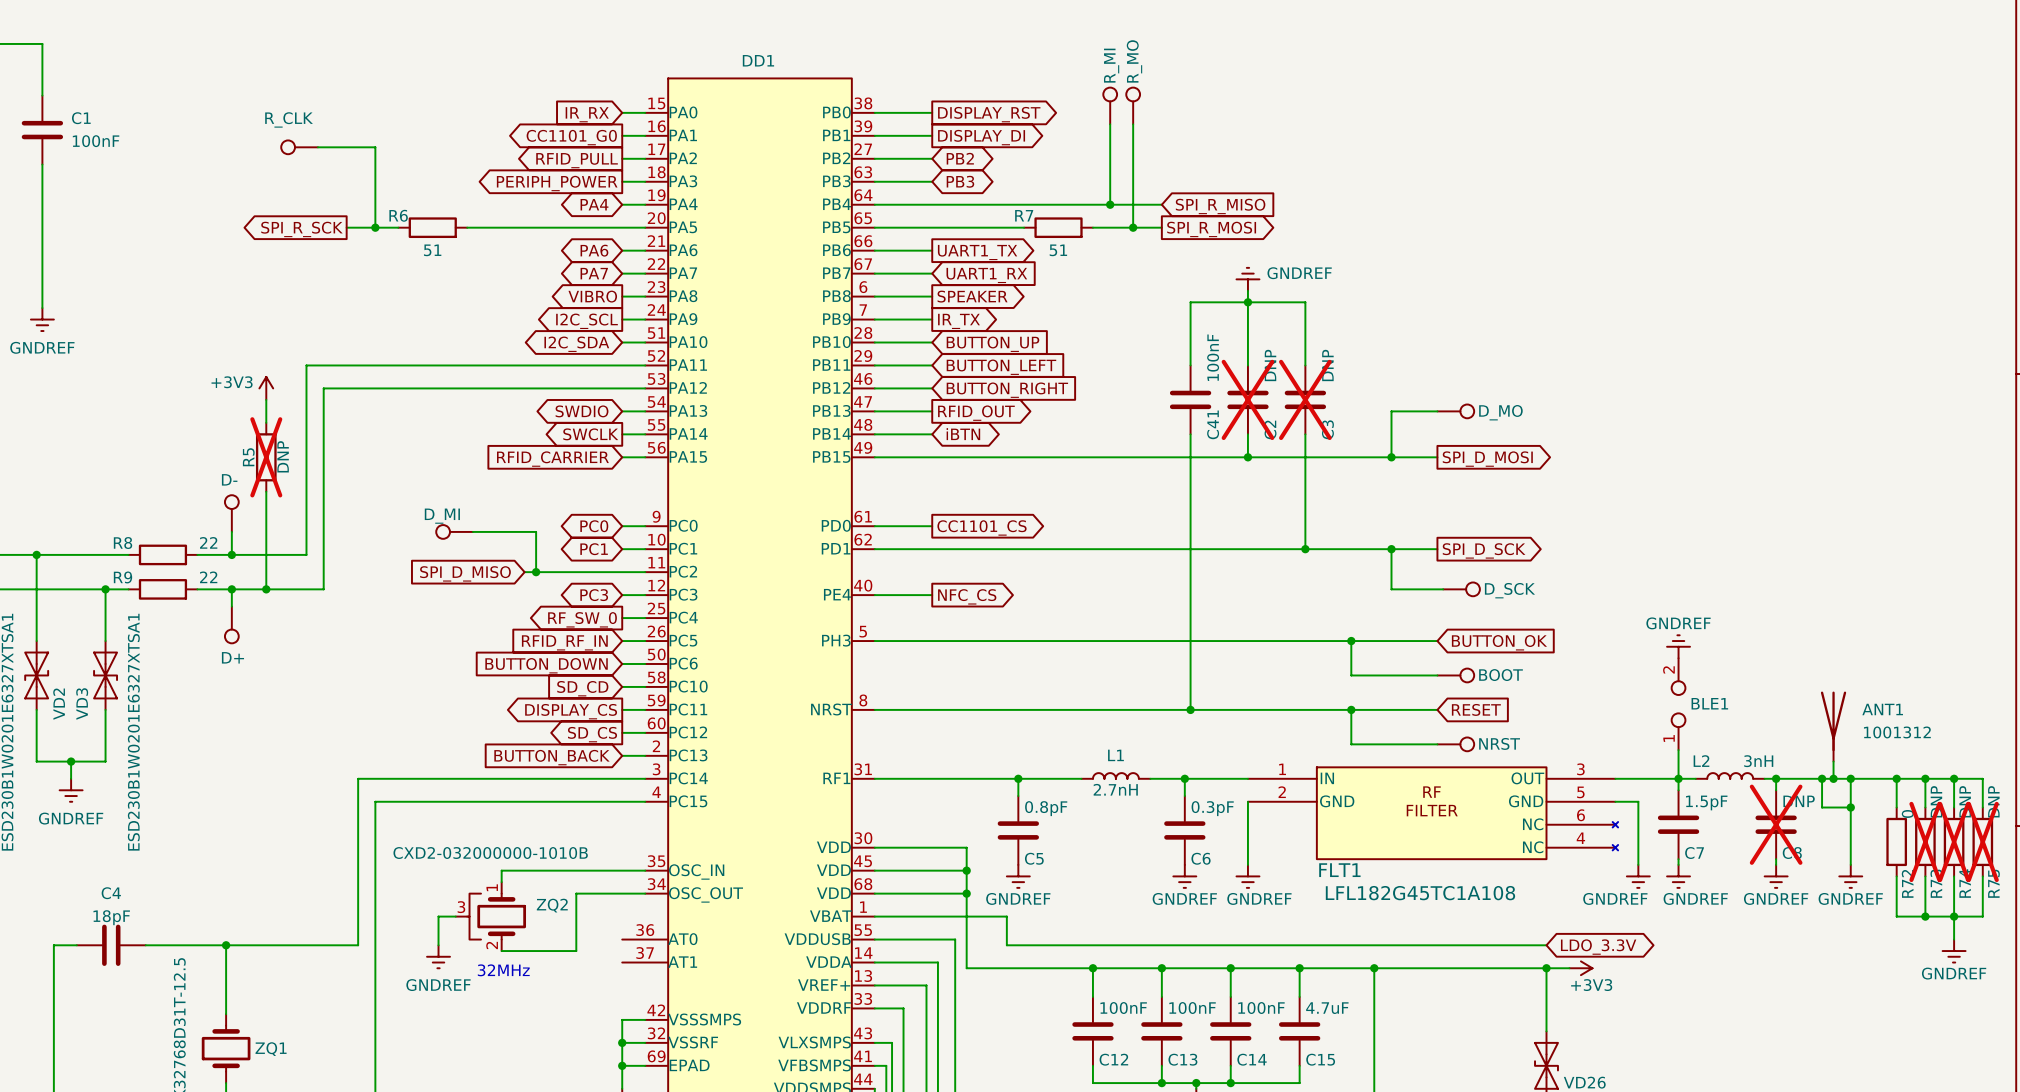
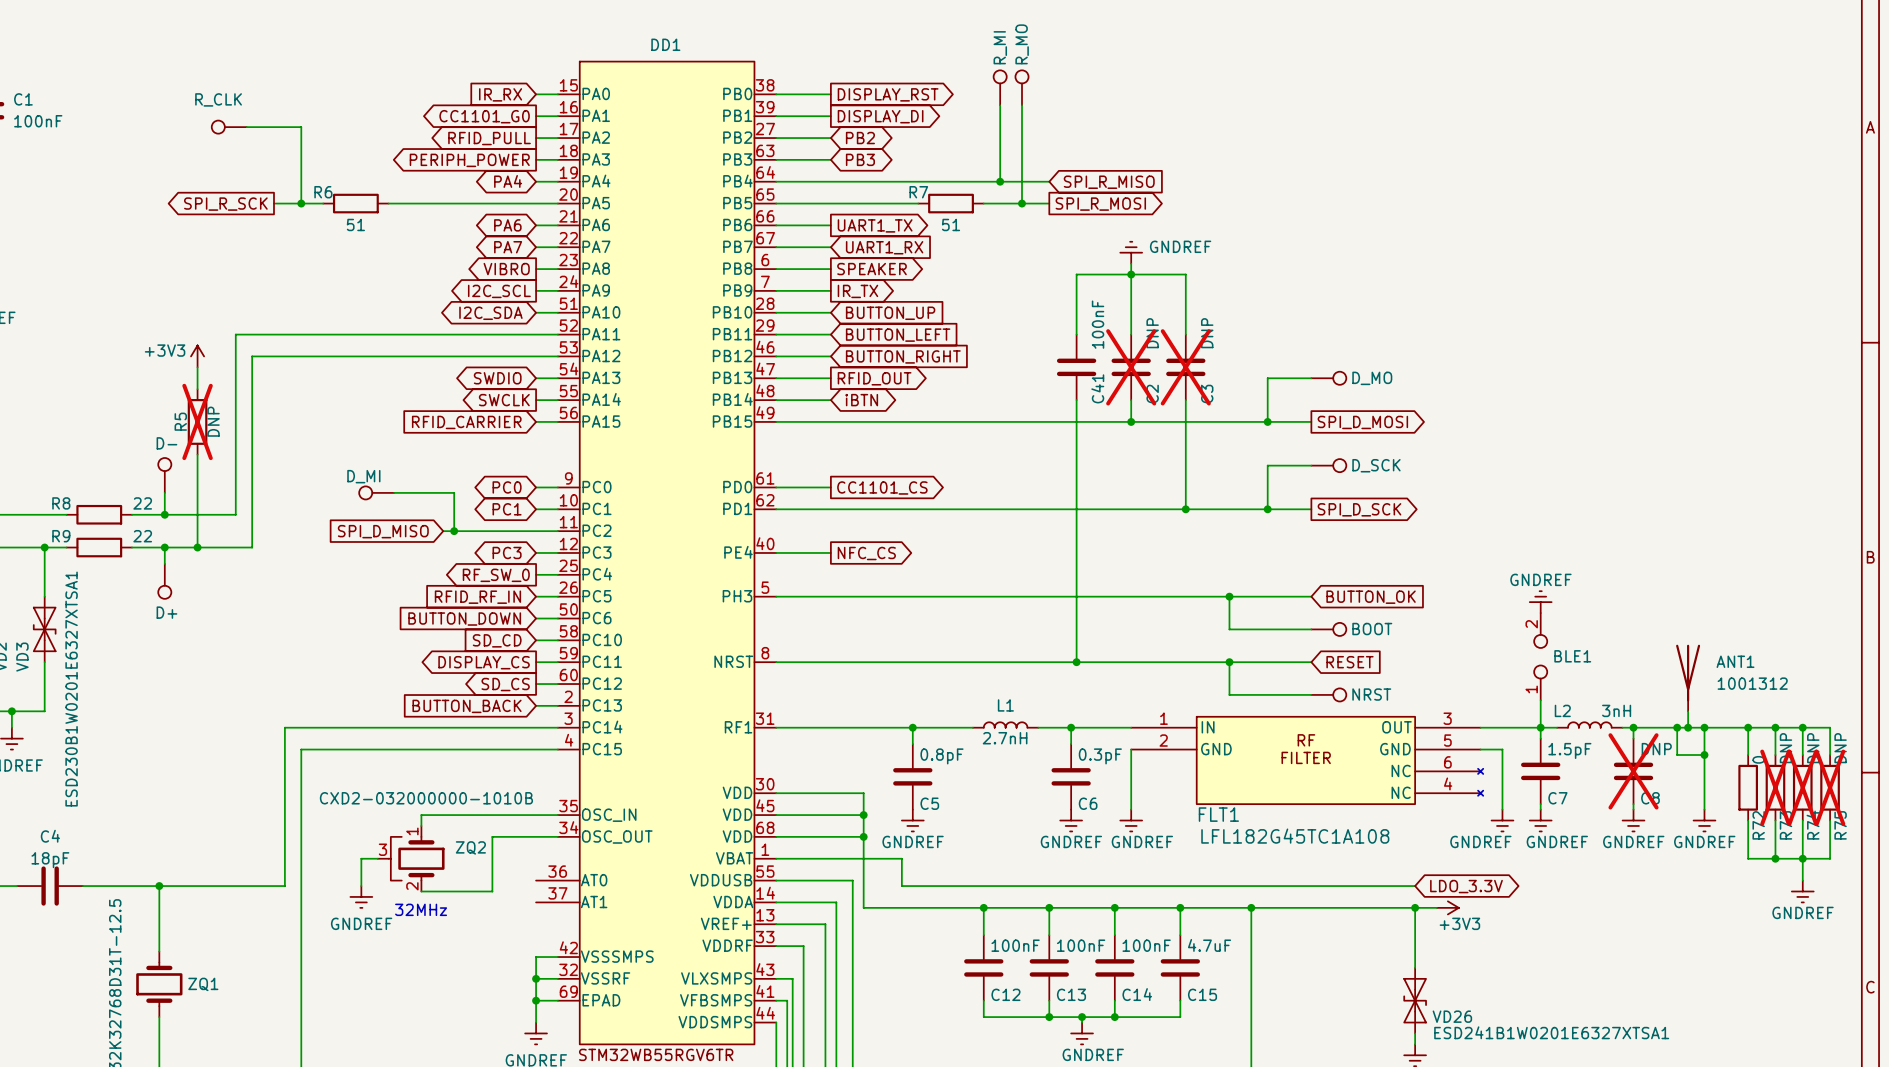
wire: (1391, 549) (1391, 589) (1443, 589) -> (1267, 509) (1267, 465) (1311, 465)
part position: (1461, 589) -> (1328, 465)

